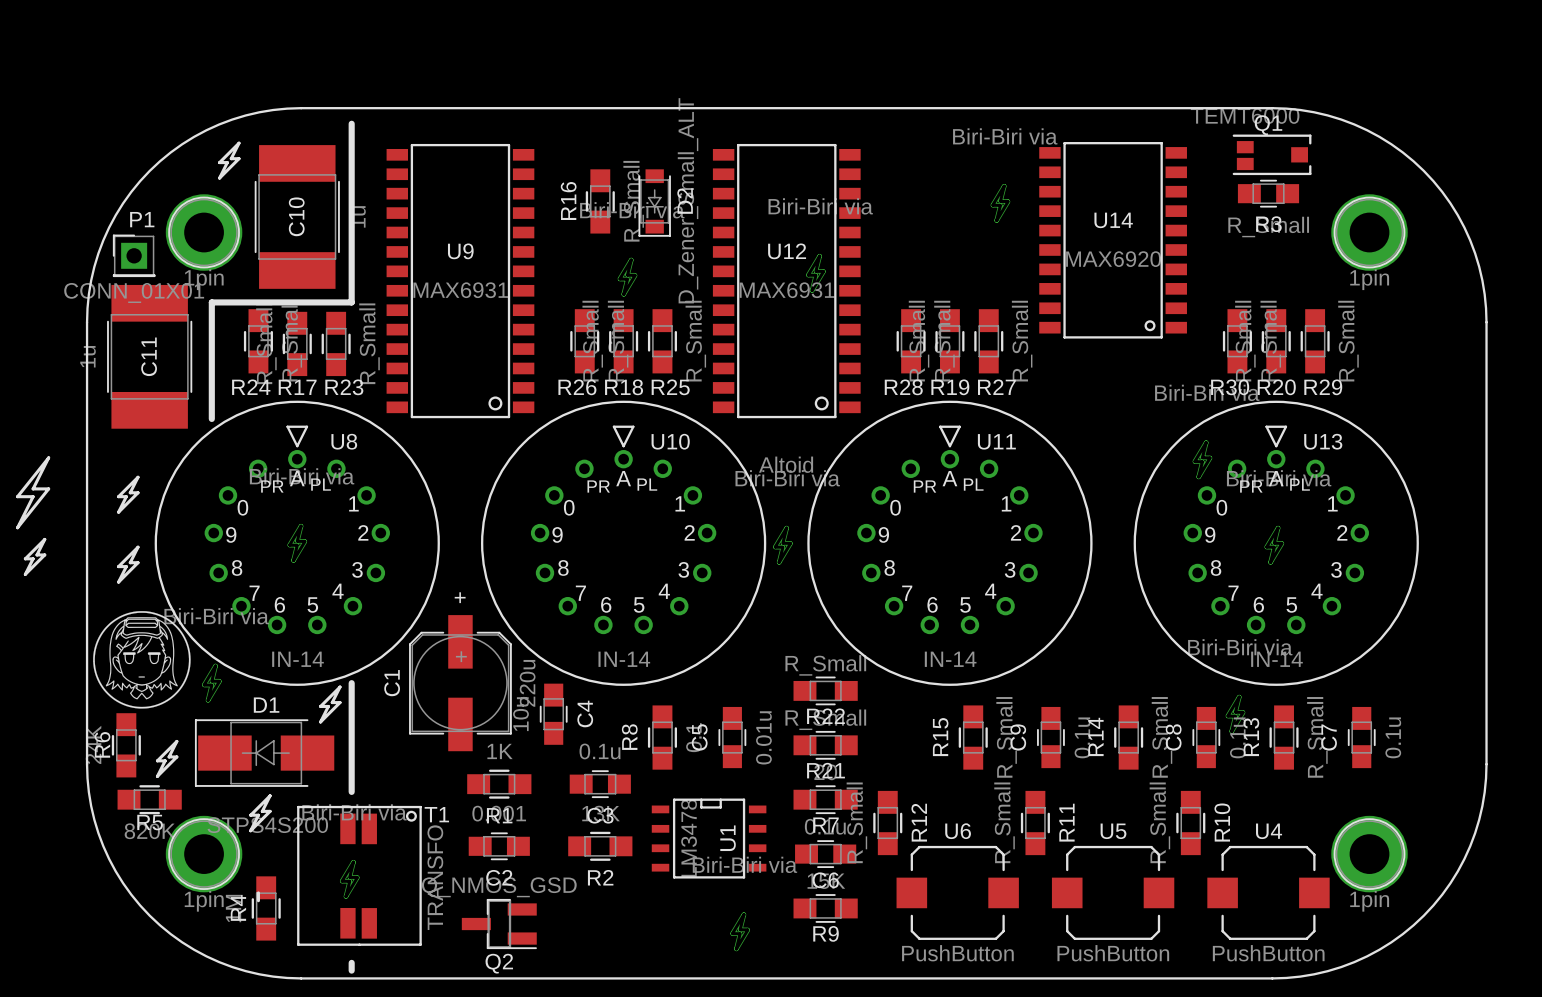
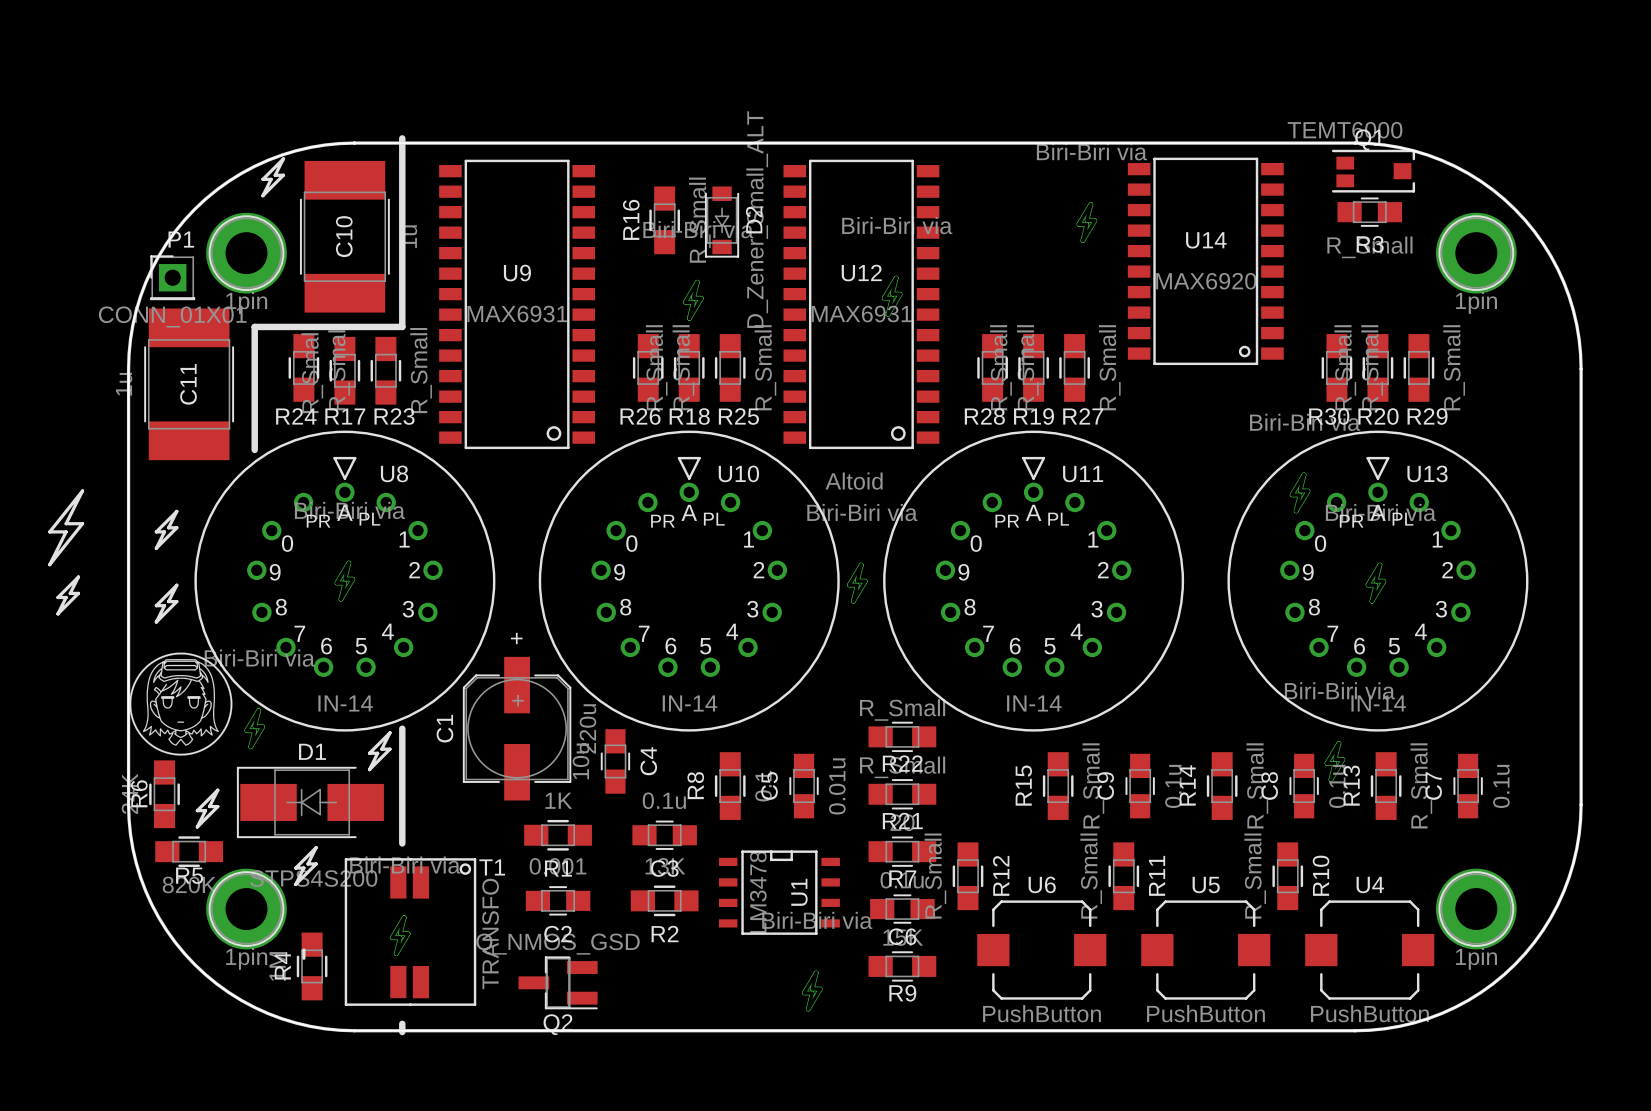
drawing shape: [85, 107, 1488, 980] -> [126, 141, 1583, 1033]

